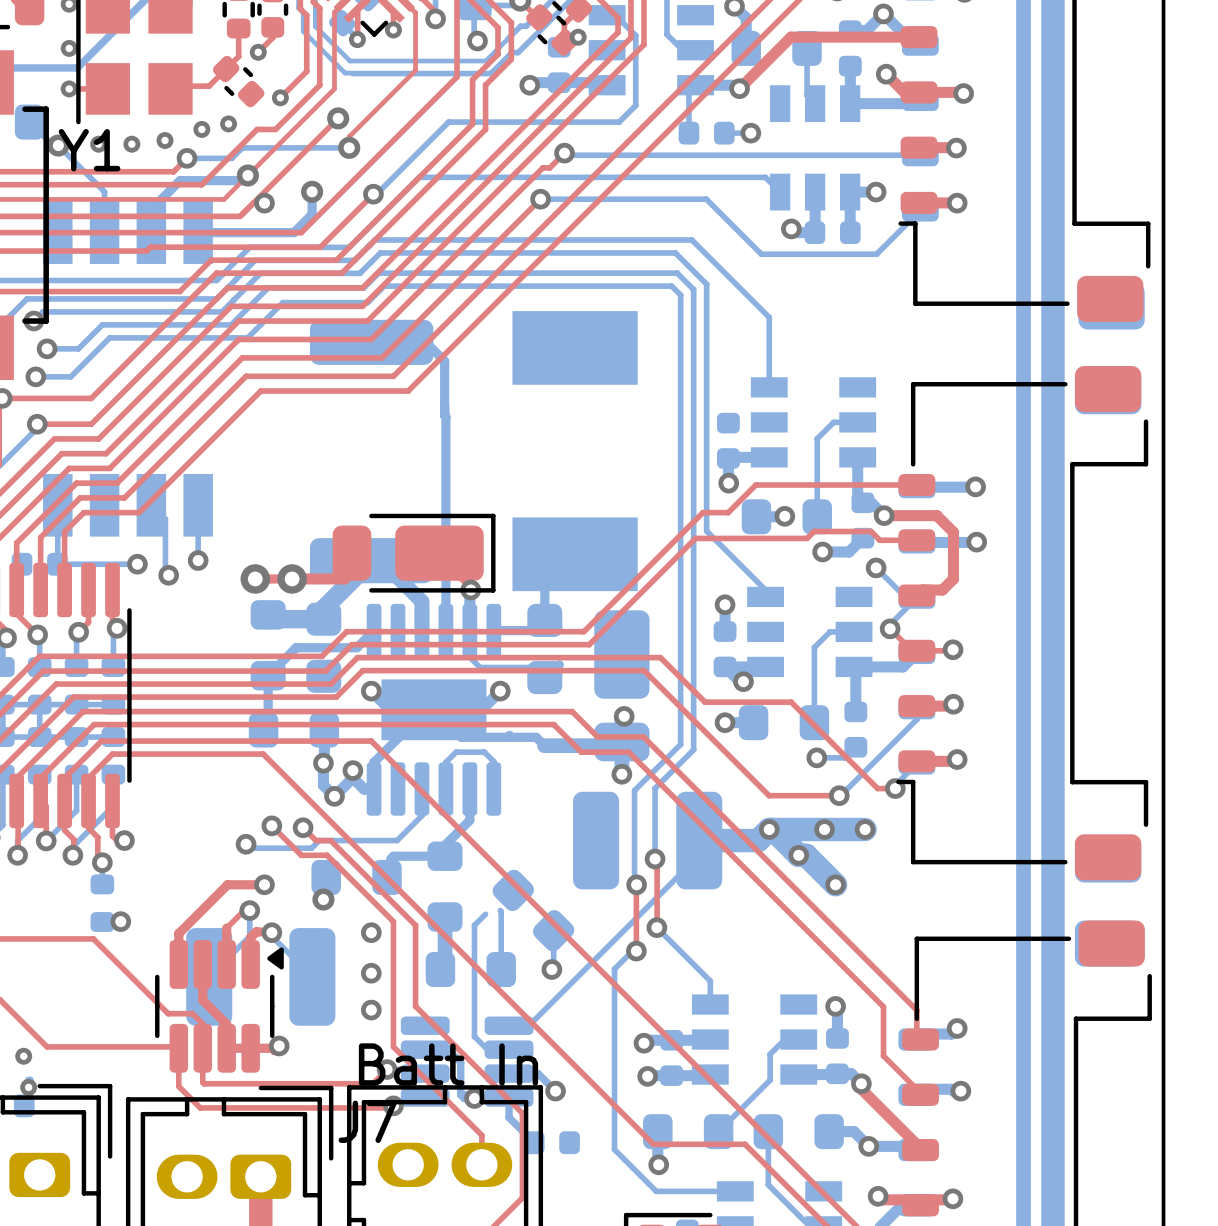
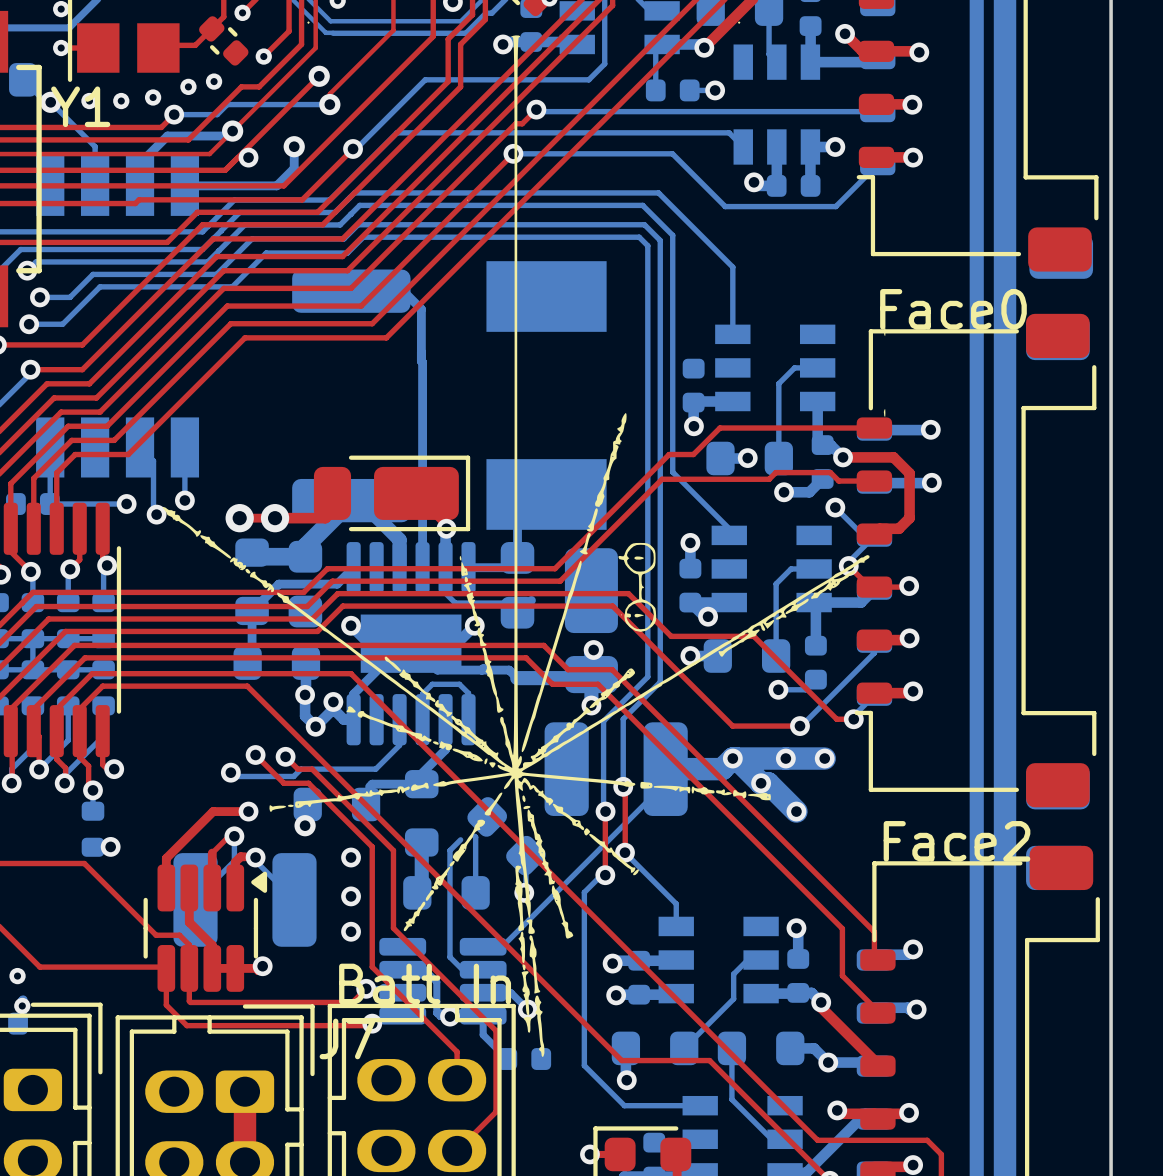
drawing: none -> [162, 21, 886, 1058]
text: none -> Face0 (953, 309)
text: none -> Face2 (957, 841)

